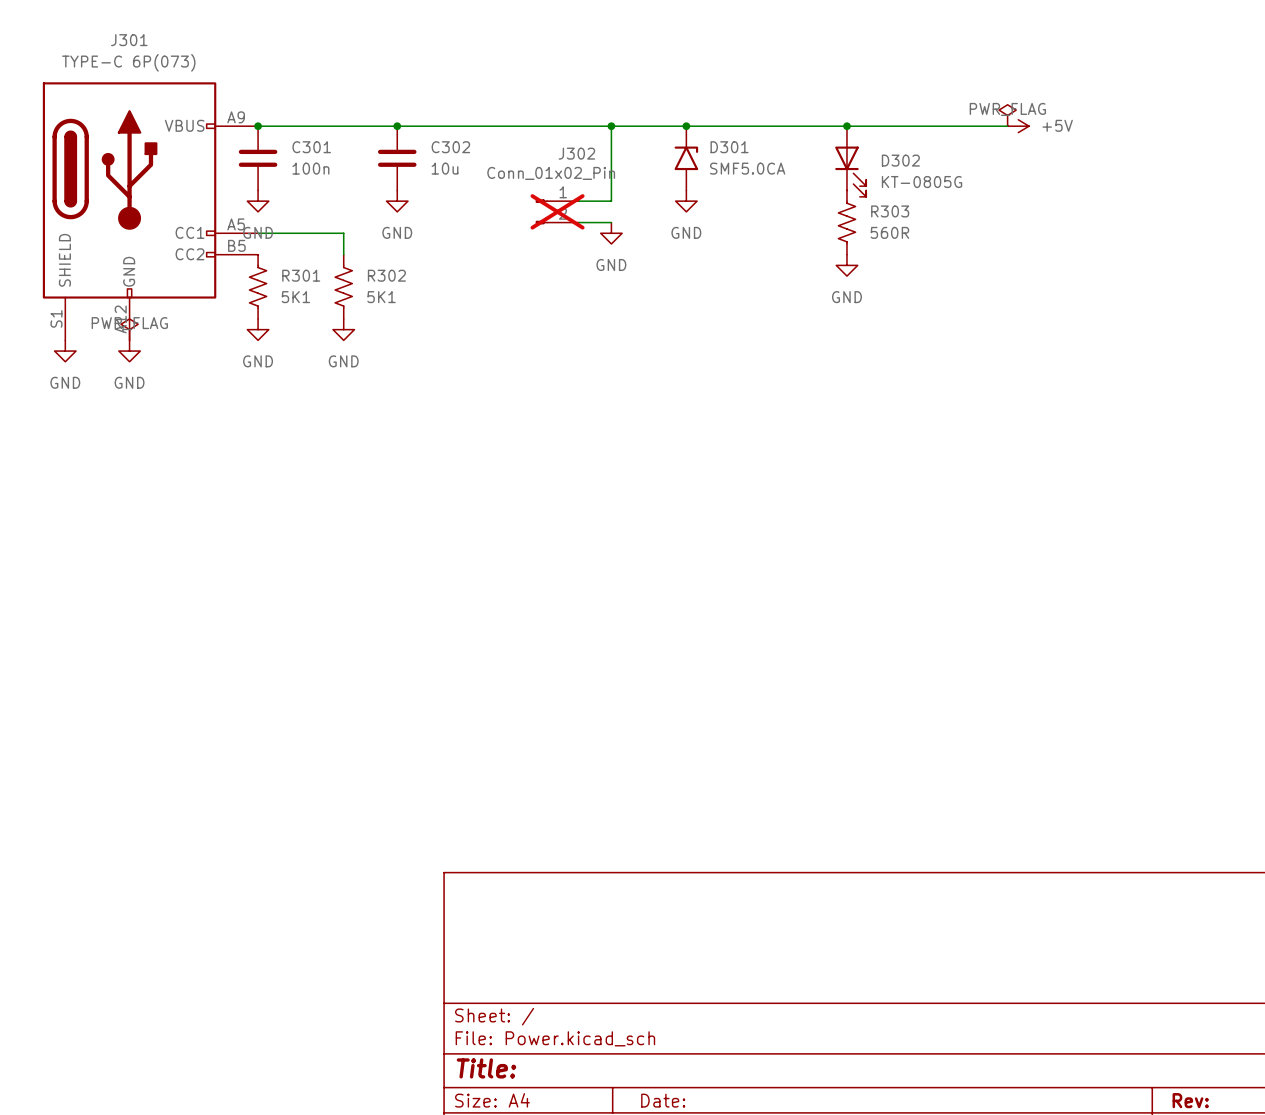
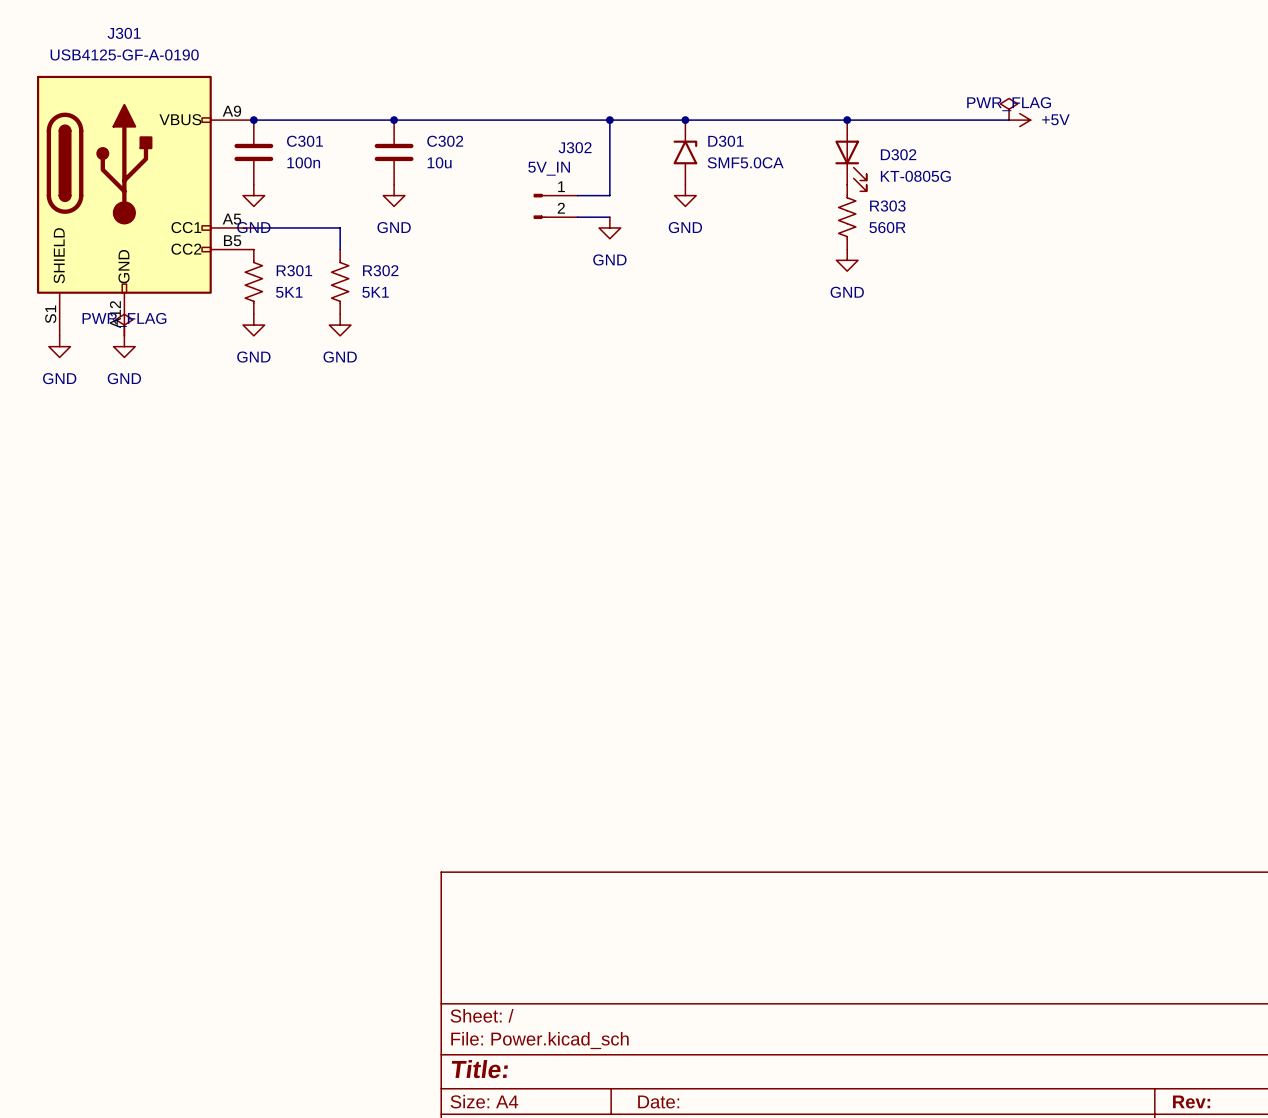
J301 value: TYPE-C 6P(073) (128, 62) -> USB4125-GF-A-0190 (124, 54)
J302 value: Conn_01x02_Pin (551, 173) -> 5V_IN (549, 168)
J302 do-not-place cross: (557, 211) -> none

